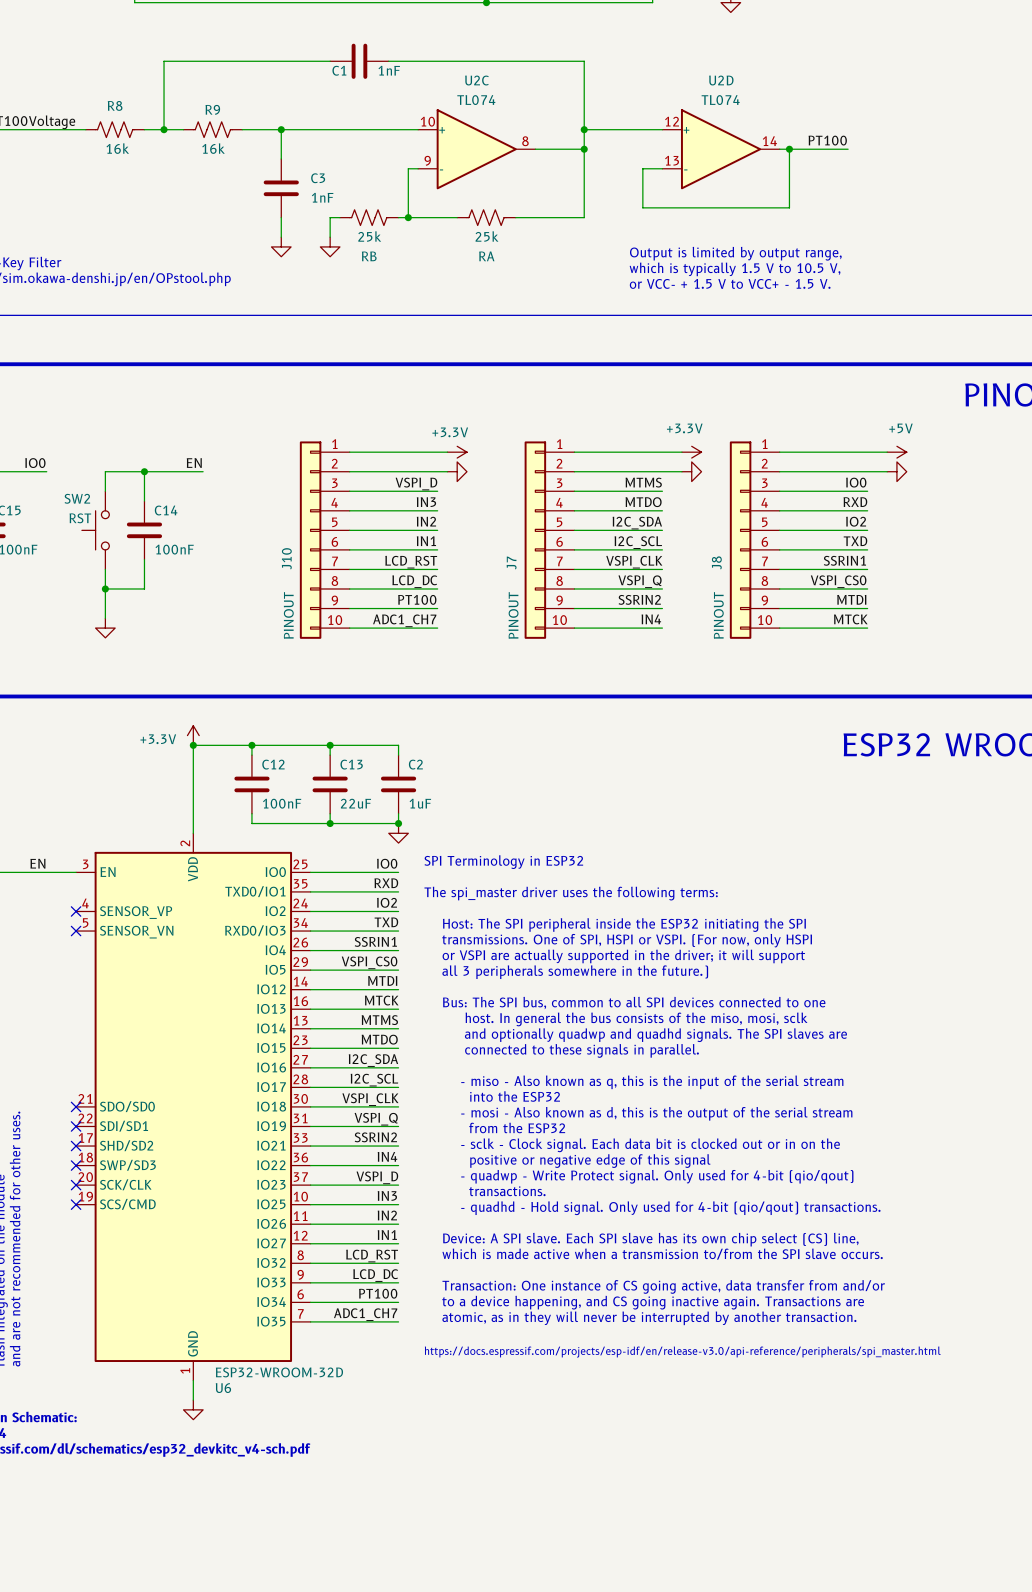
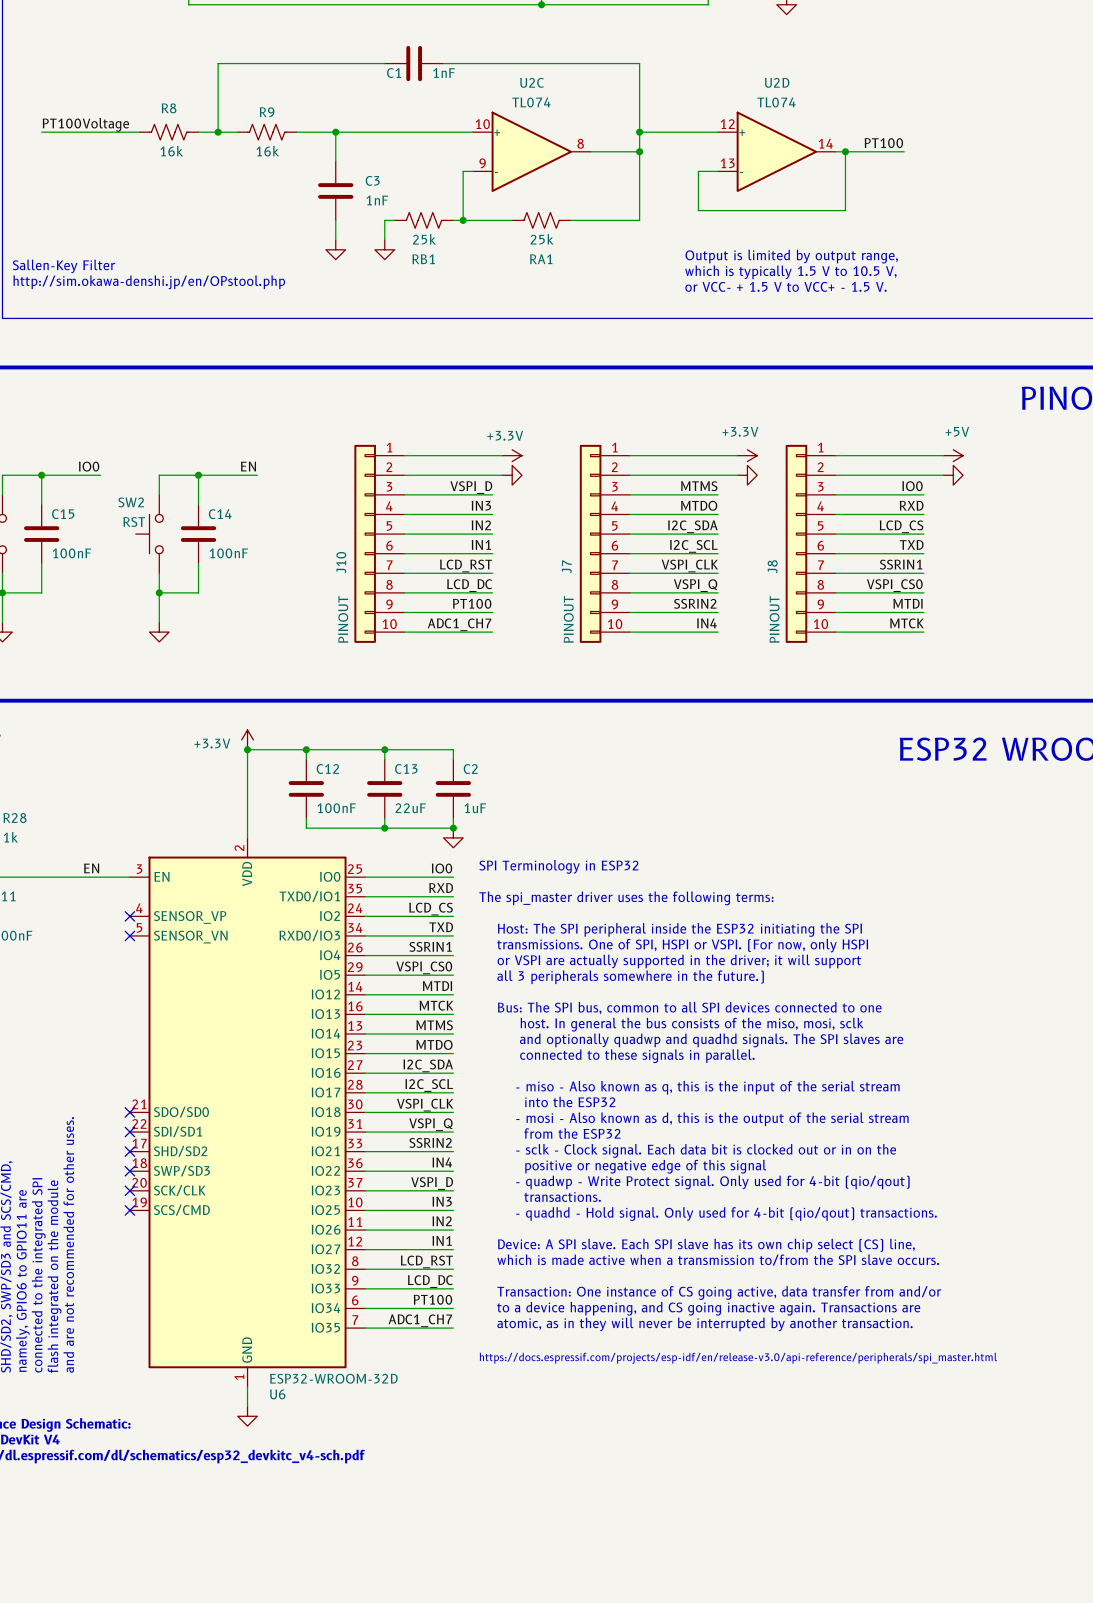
RB name: RB (369, 256) -> RB1 (423, 259)
RA name: RA (486, 256) -> RA1 (541, 259)
label: IO2 (856, 521) -> LCD_CS (901, 526)
label: IO2 (387, 902) -> LCD_CS (431, 909)

